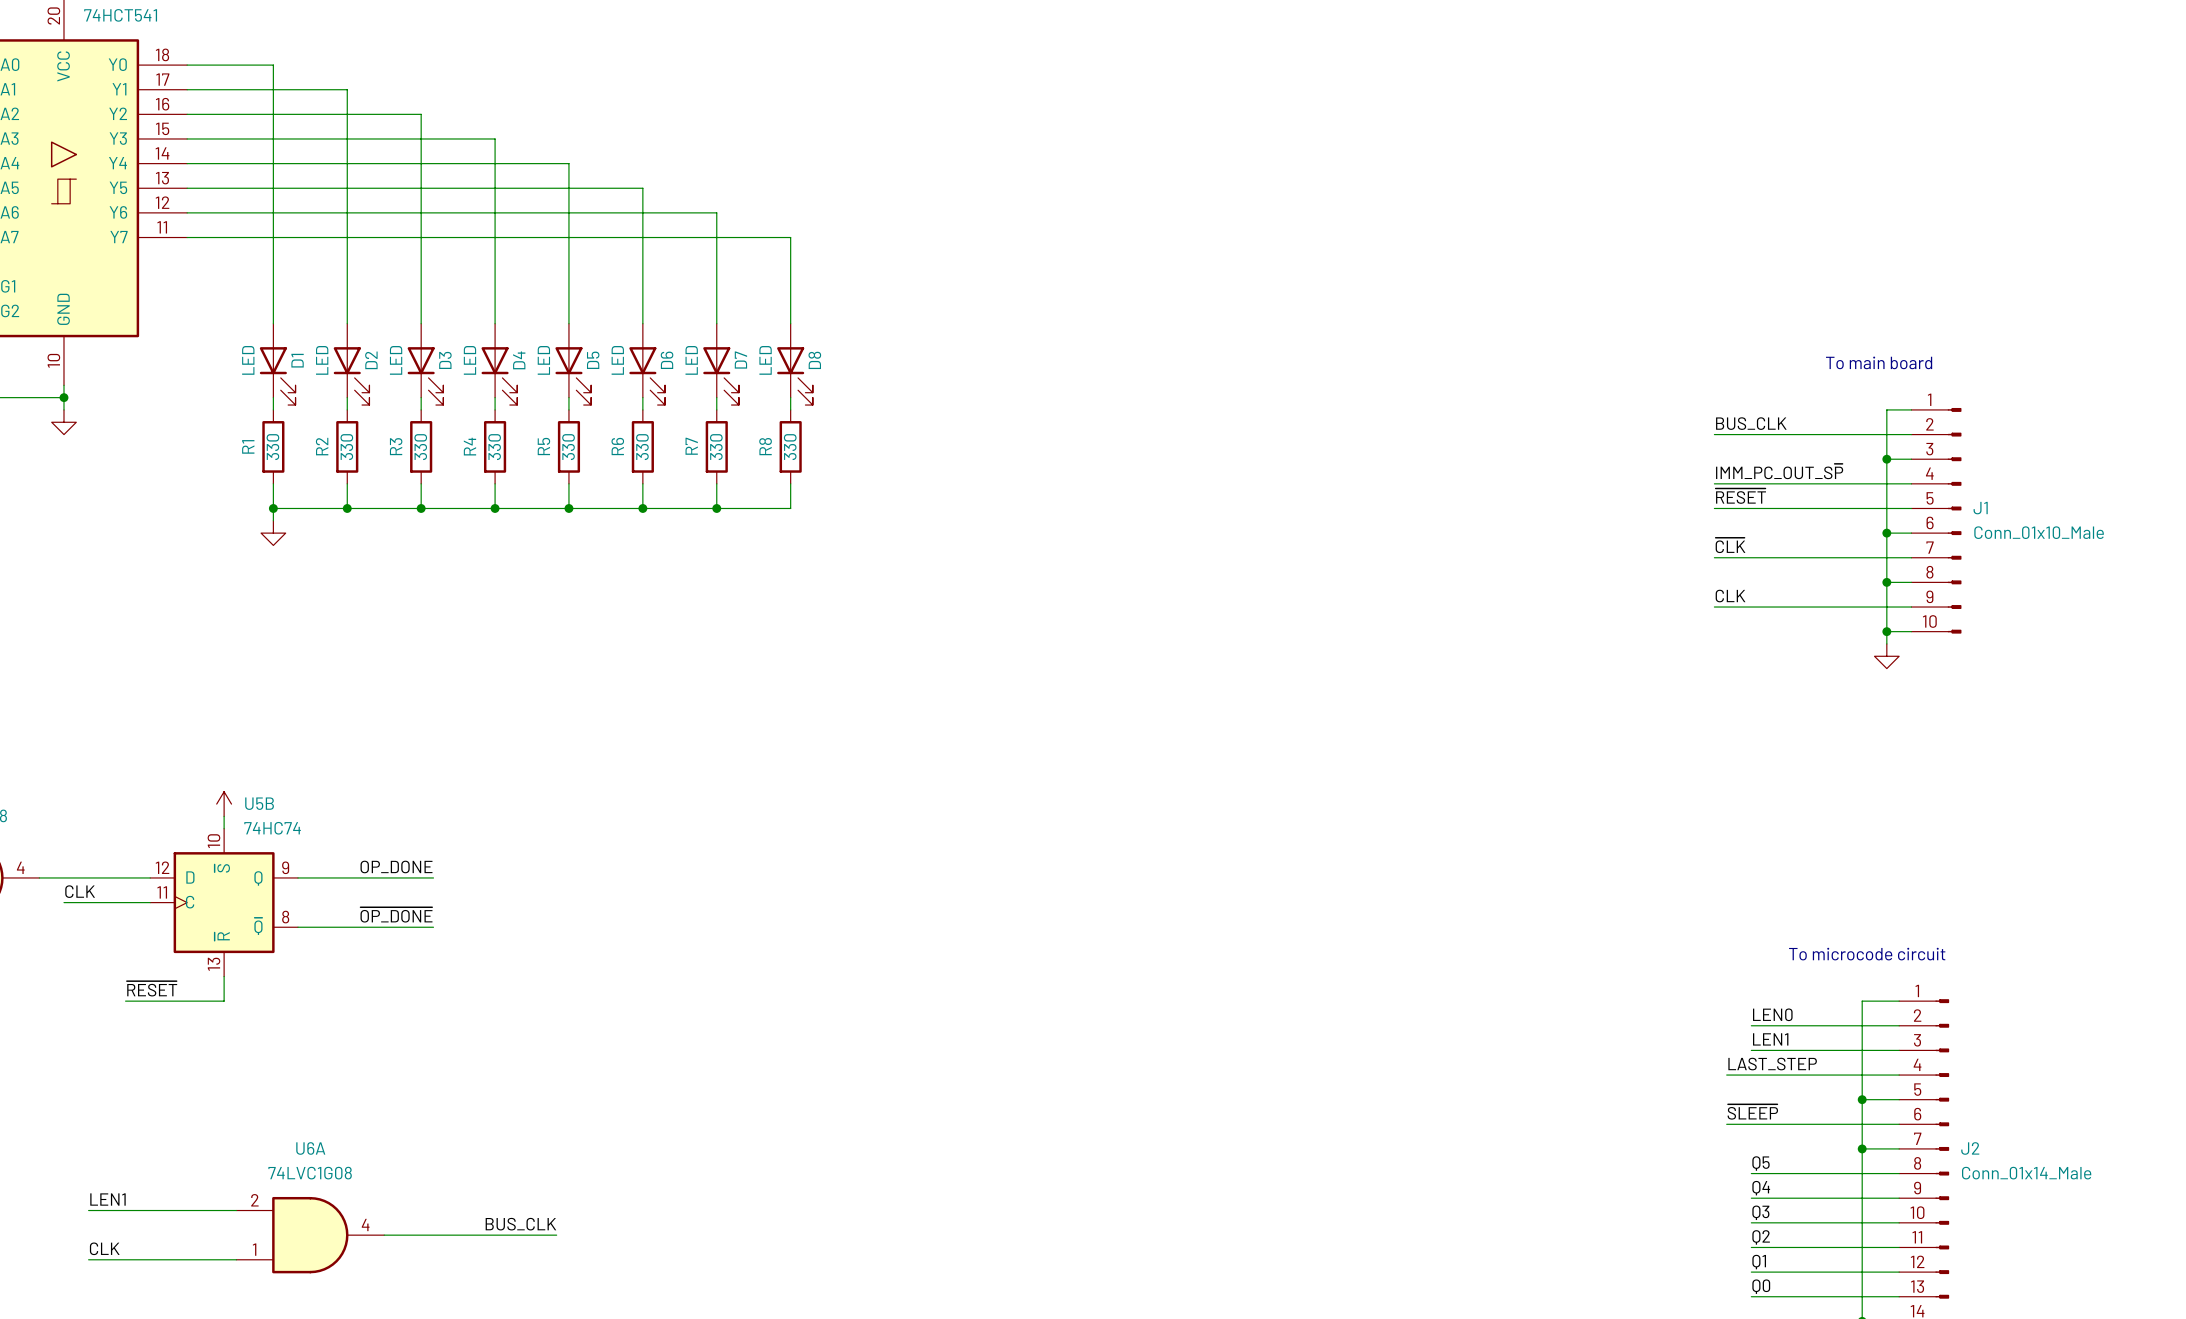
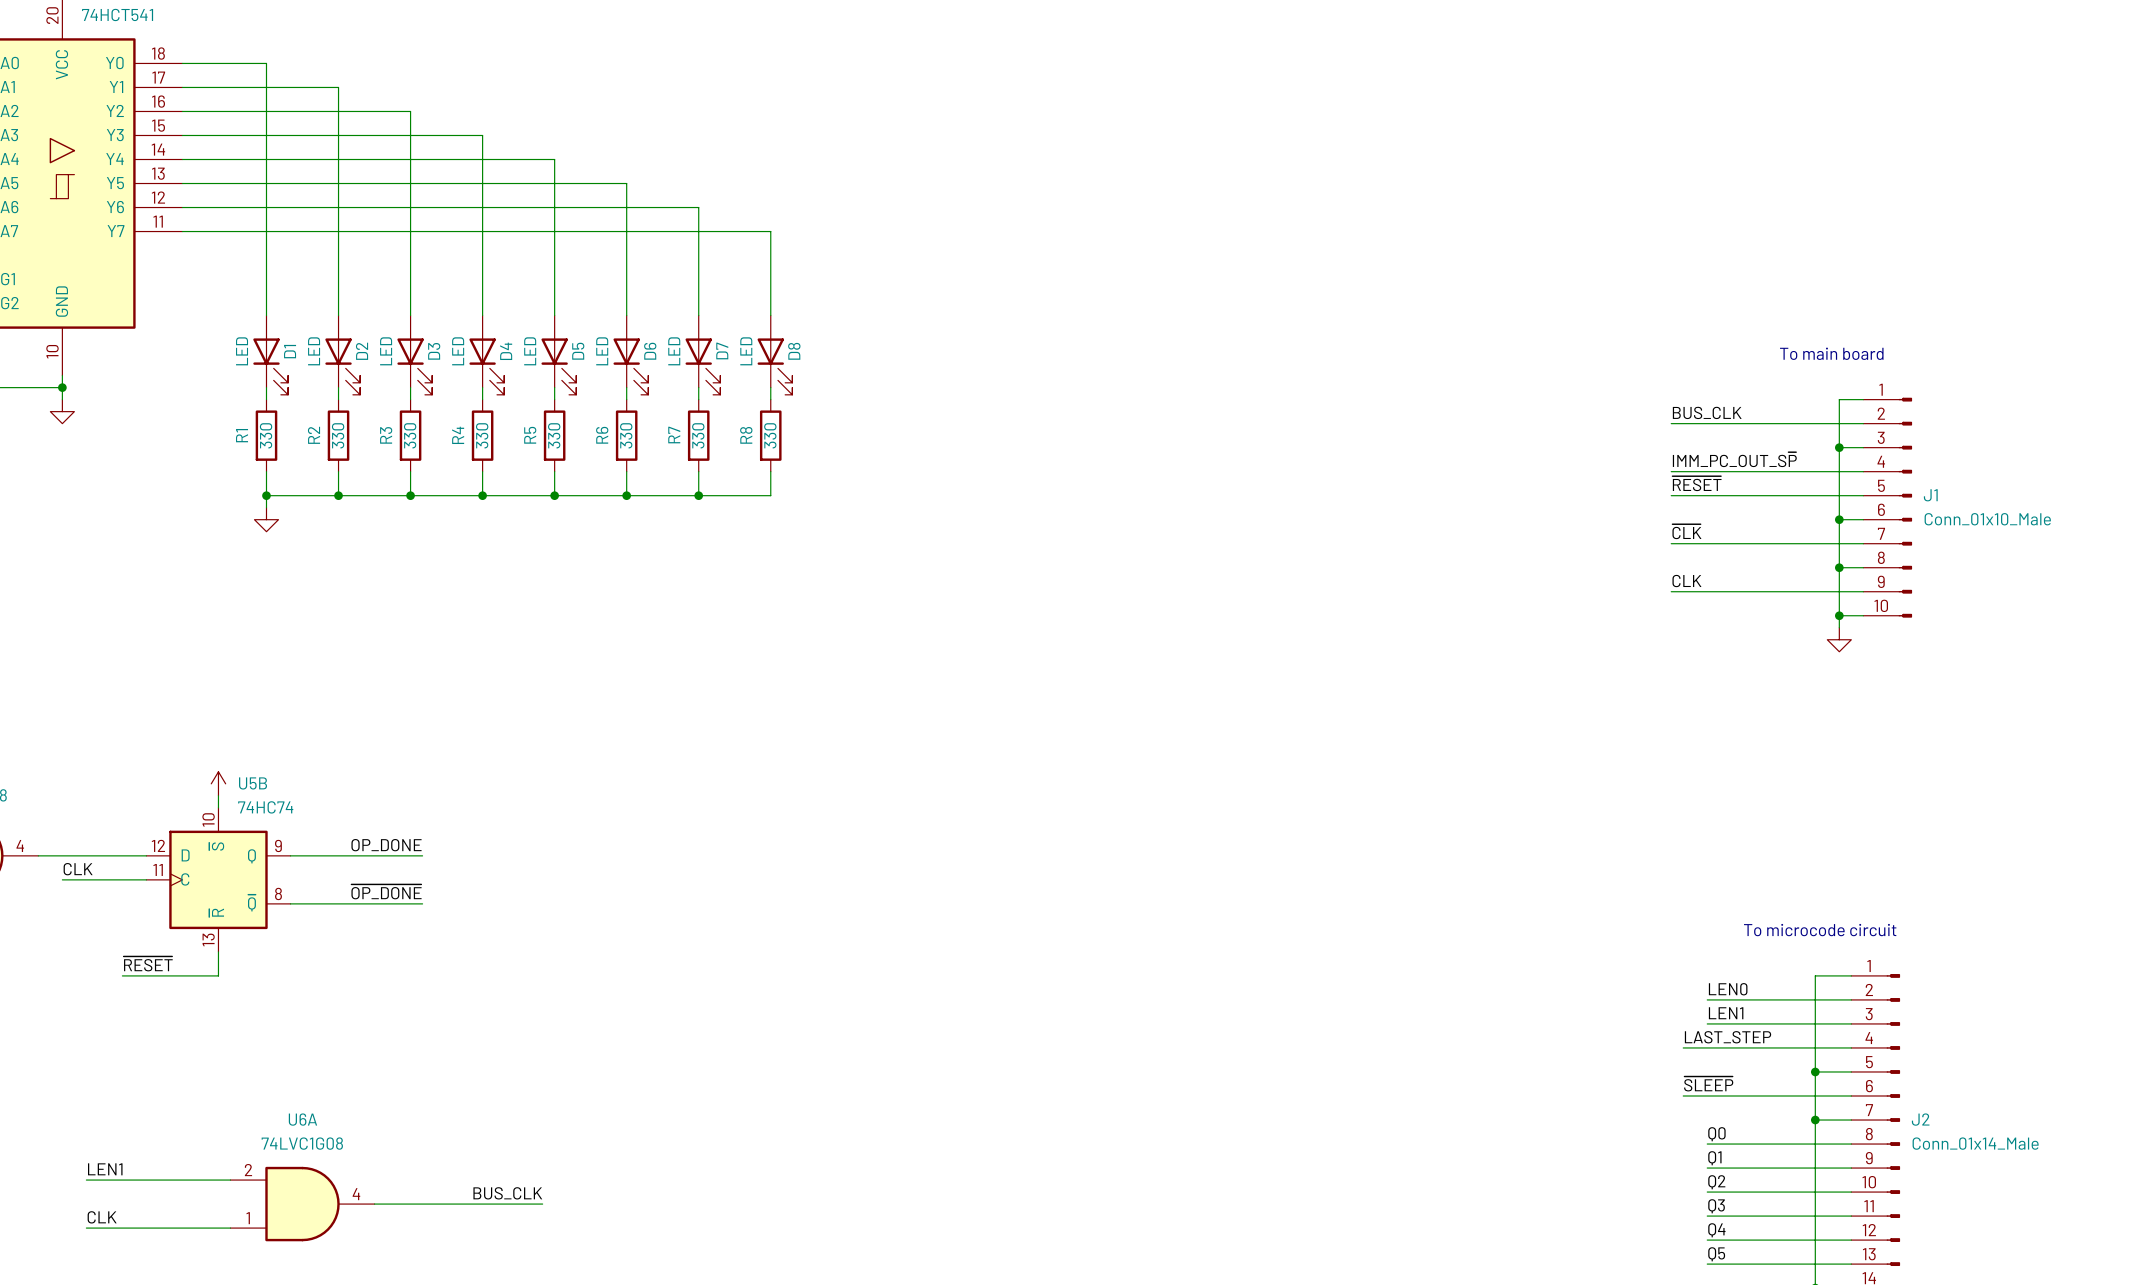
label: Q5 (1761, 1163) -> Q0 (1716, 1134)
label: Q4 (1761, 1188) -> Q1 (1714, 1158)
label: Q3 (1760, 1212) -> Q2 (1716, 1182)
label: Q2 (1761, 1237) -> Q3 (1716, 1206)
label: Q1 (1759, 1262) -> Q4 (1716, 1230)
label: Q0 (1761, 1286) -> Q5 (1716, 1254)

